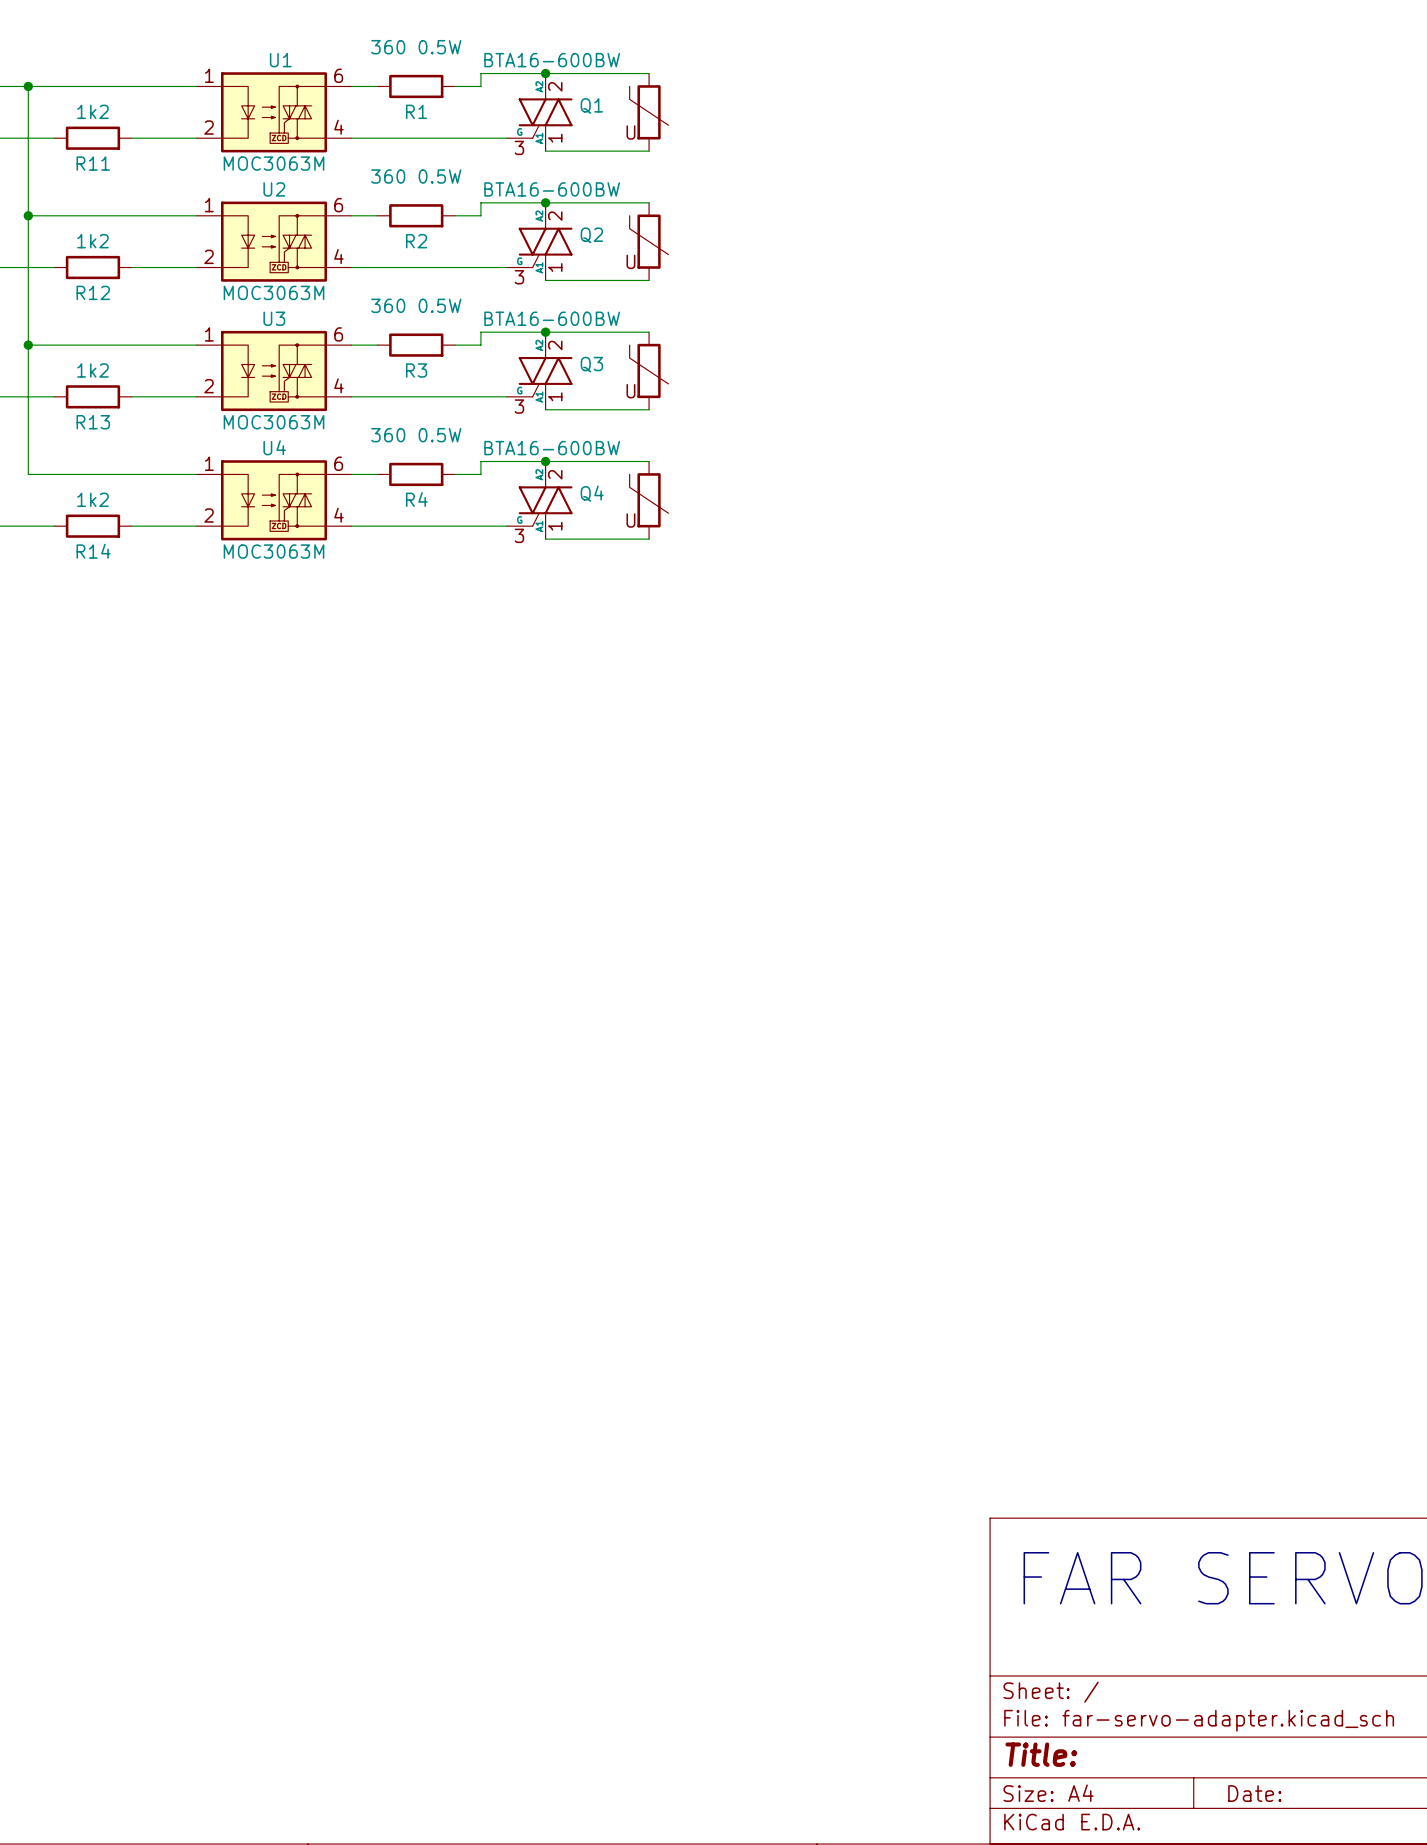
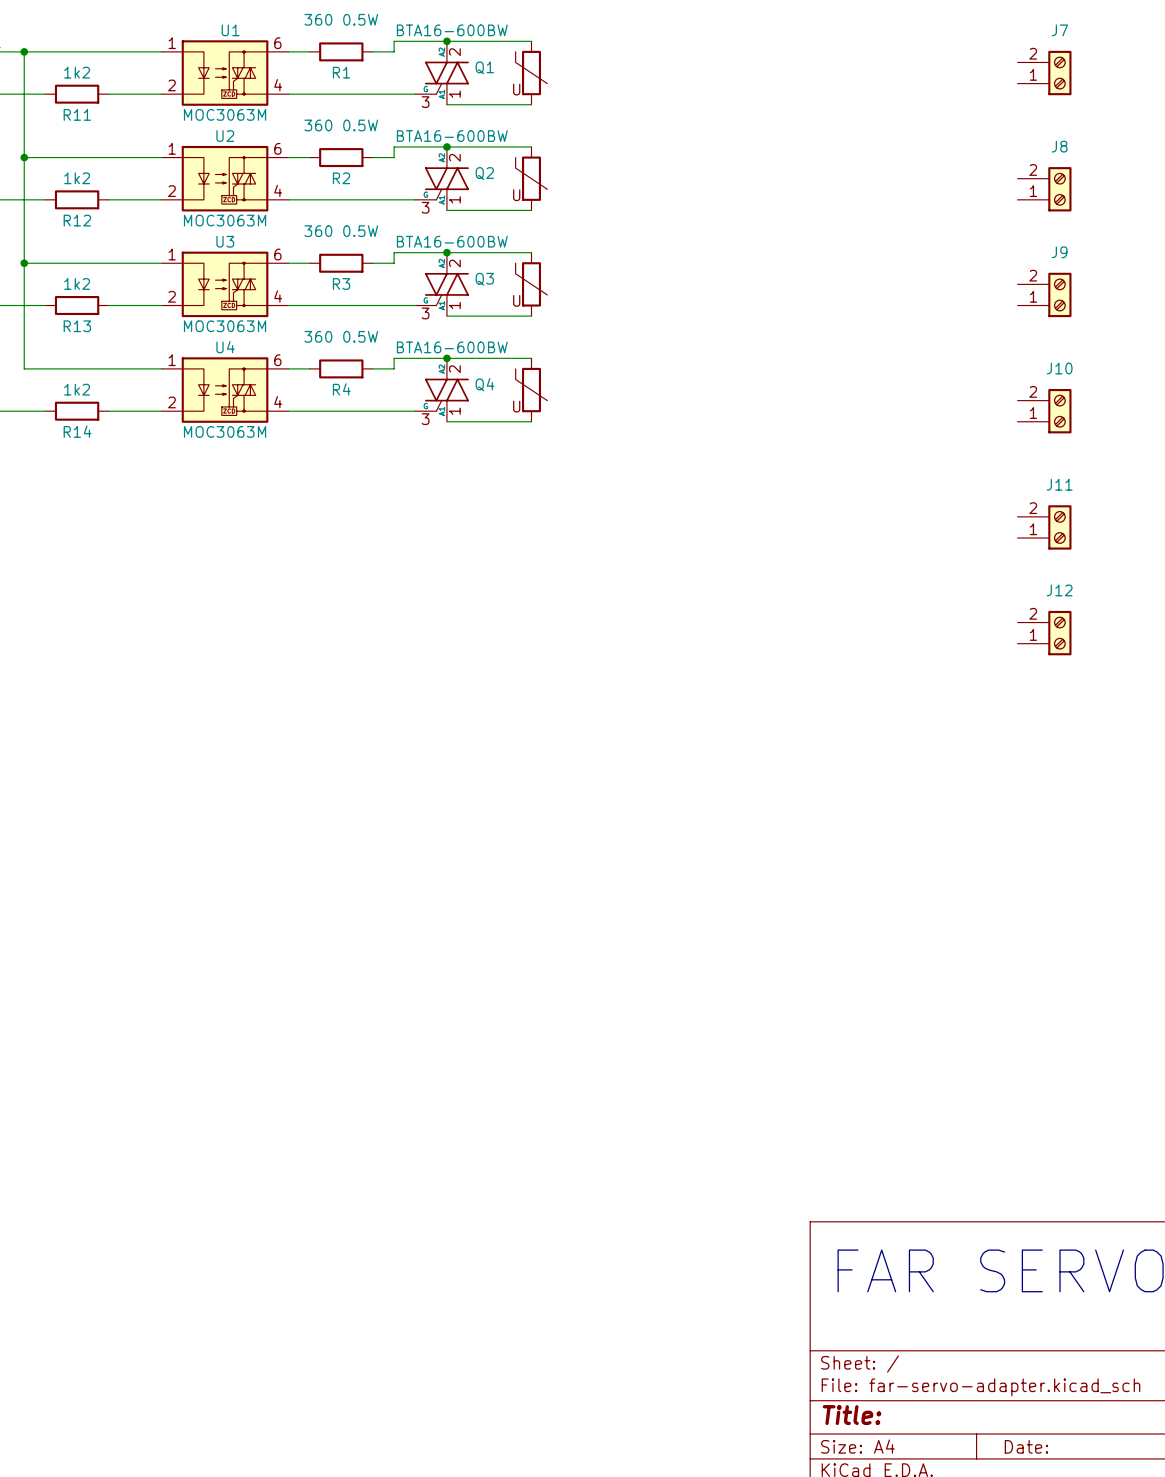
J7: none -> (1044, 73)
J8: none -> (1044, 189)
J9: none -> (1044, 294)
J10: none -> (1044, 411)
J11: none -> (1044, 527)
J12: none -> (1044, 633)

